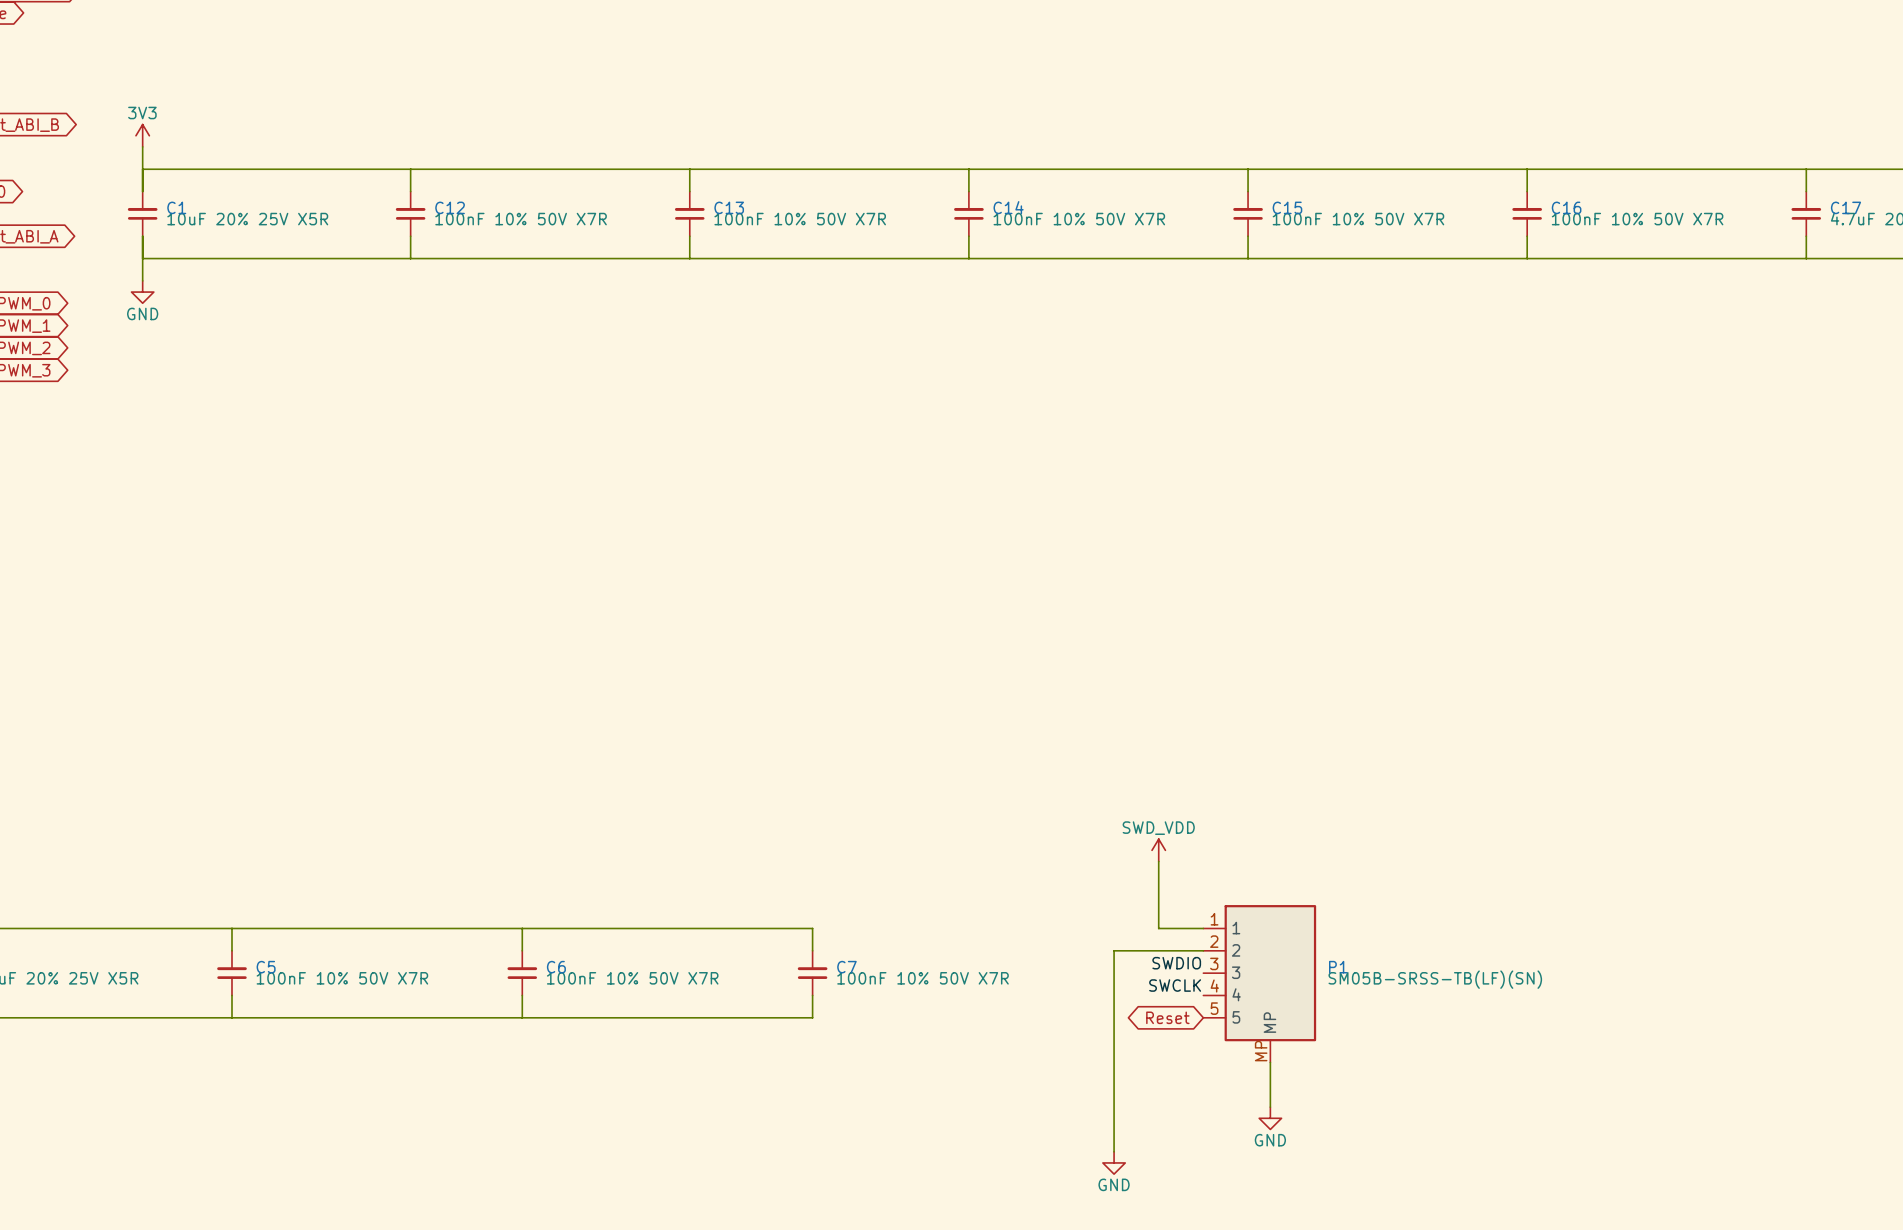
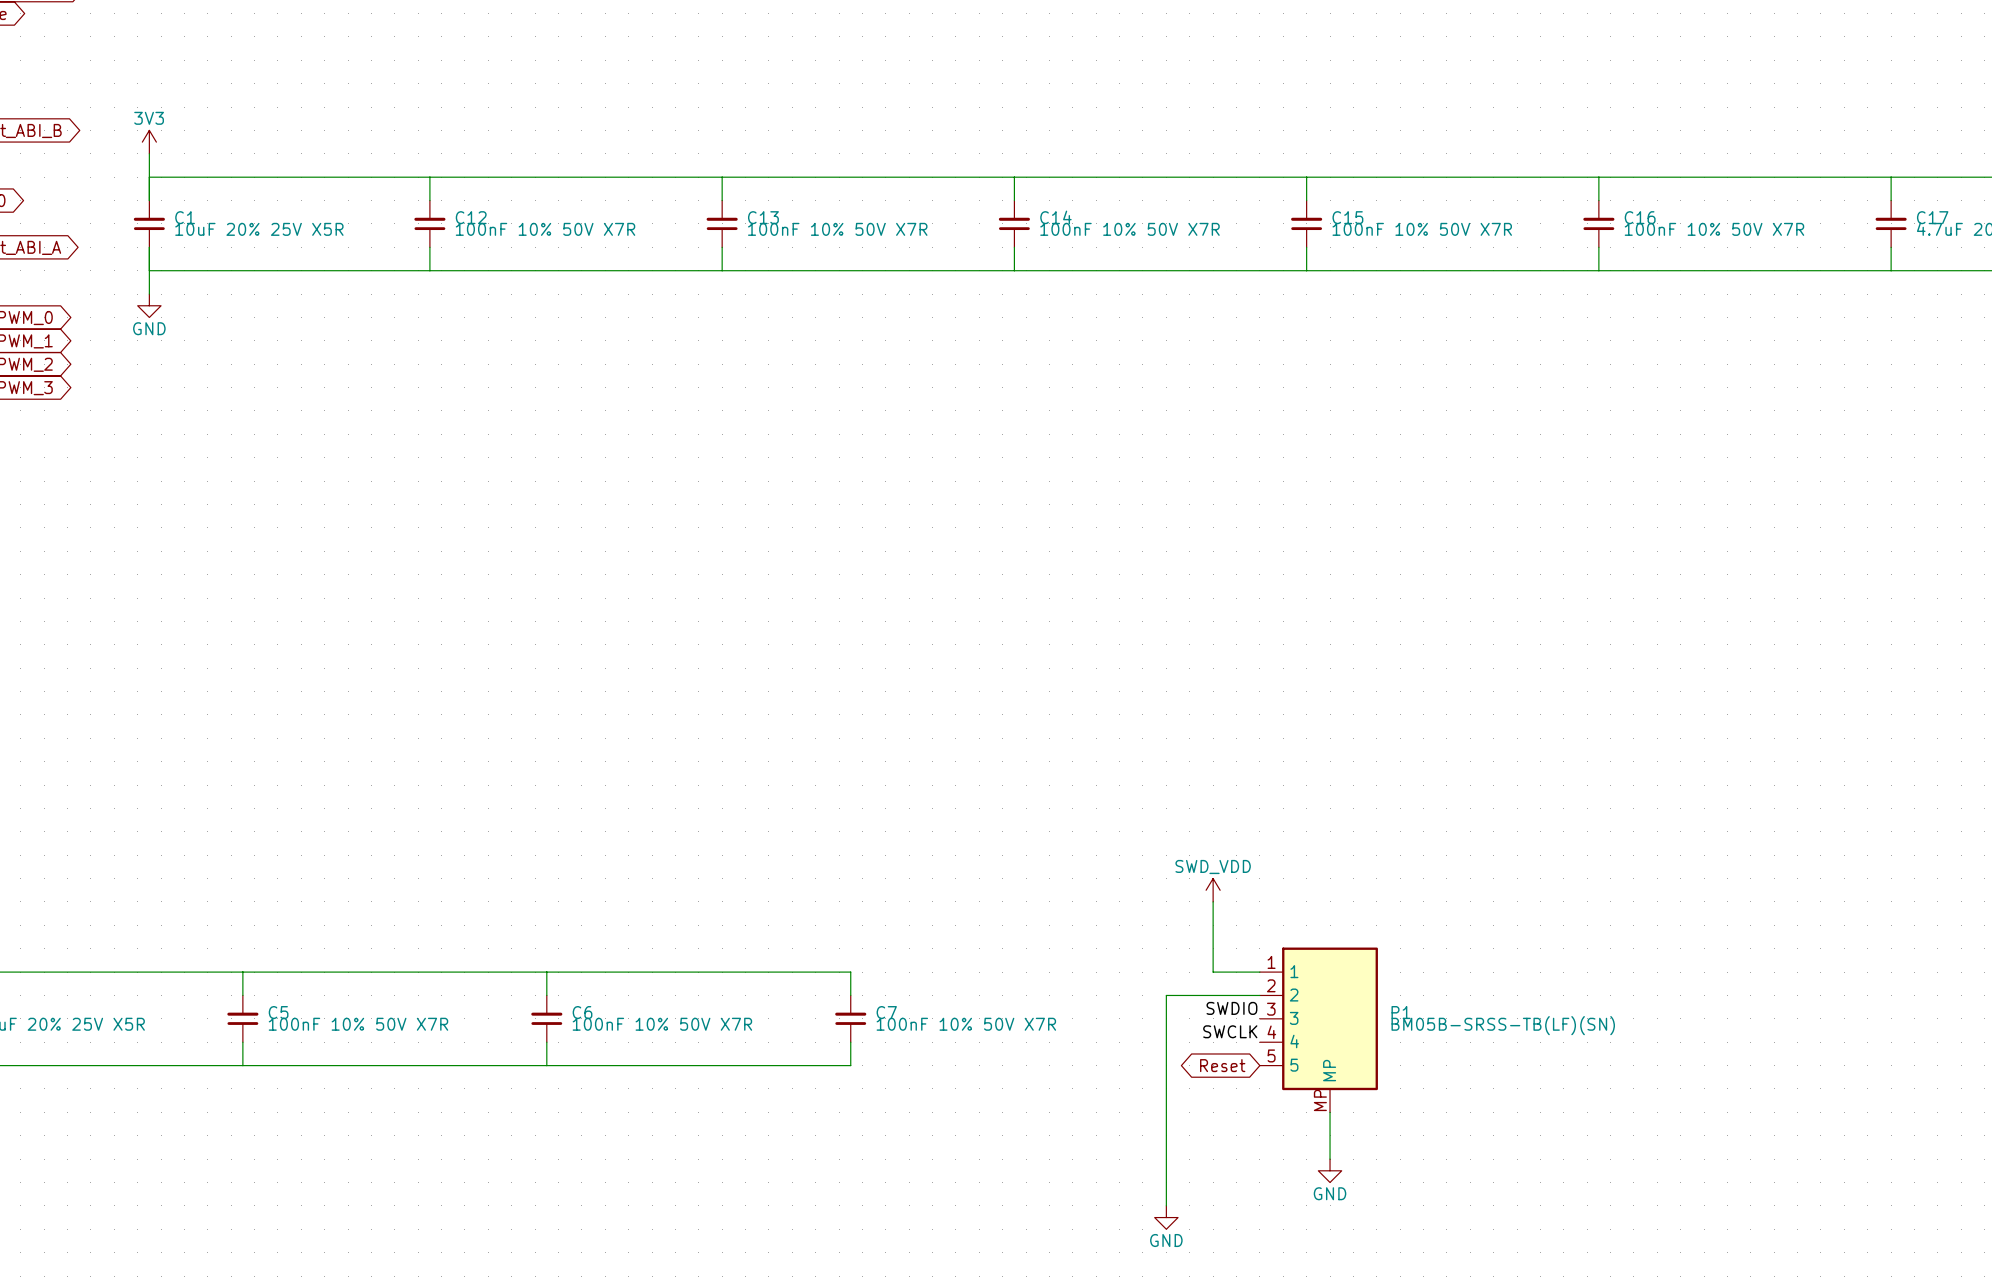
P1 value: SM05B-SRSS-TB(LF)(SN) (1435, 979) -> BM05B-SRSS-TB(LF)(SN) (1503, 1025)

